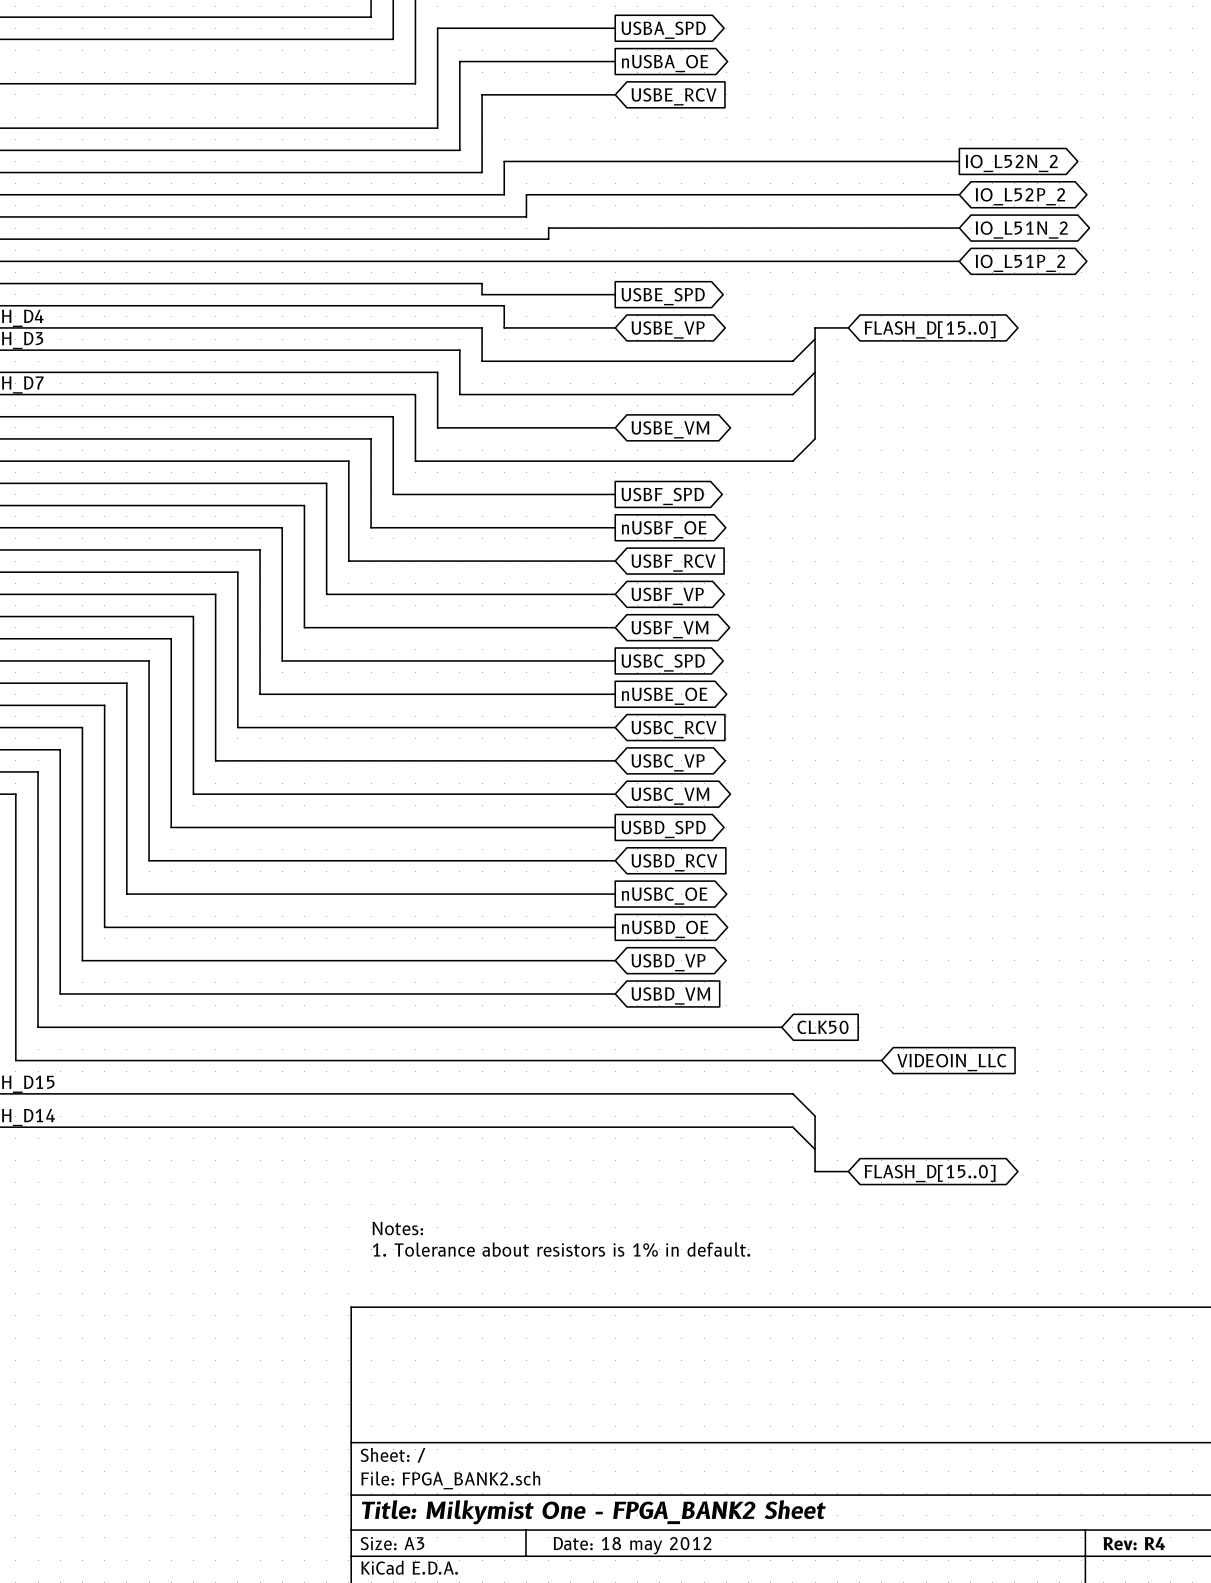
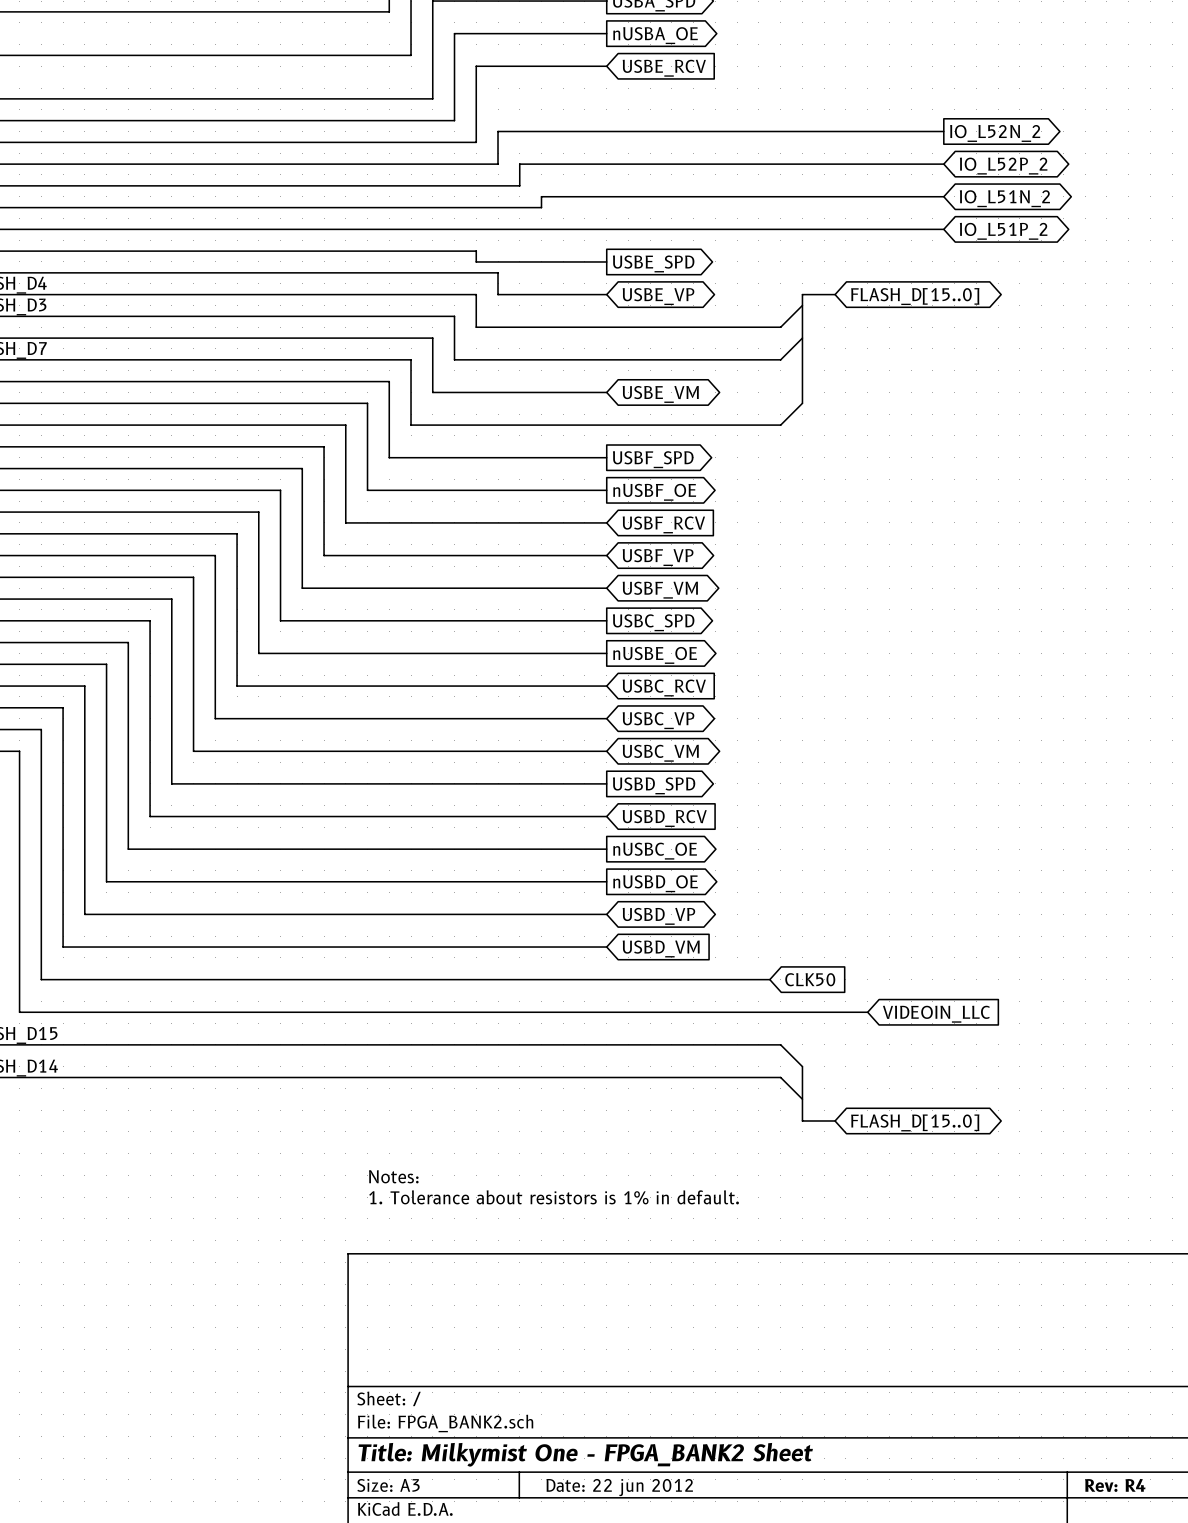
title block: Date: 18 may 2012 (632, 1545) -> Date: 22 jun 2012 (619, 1487)

